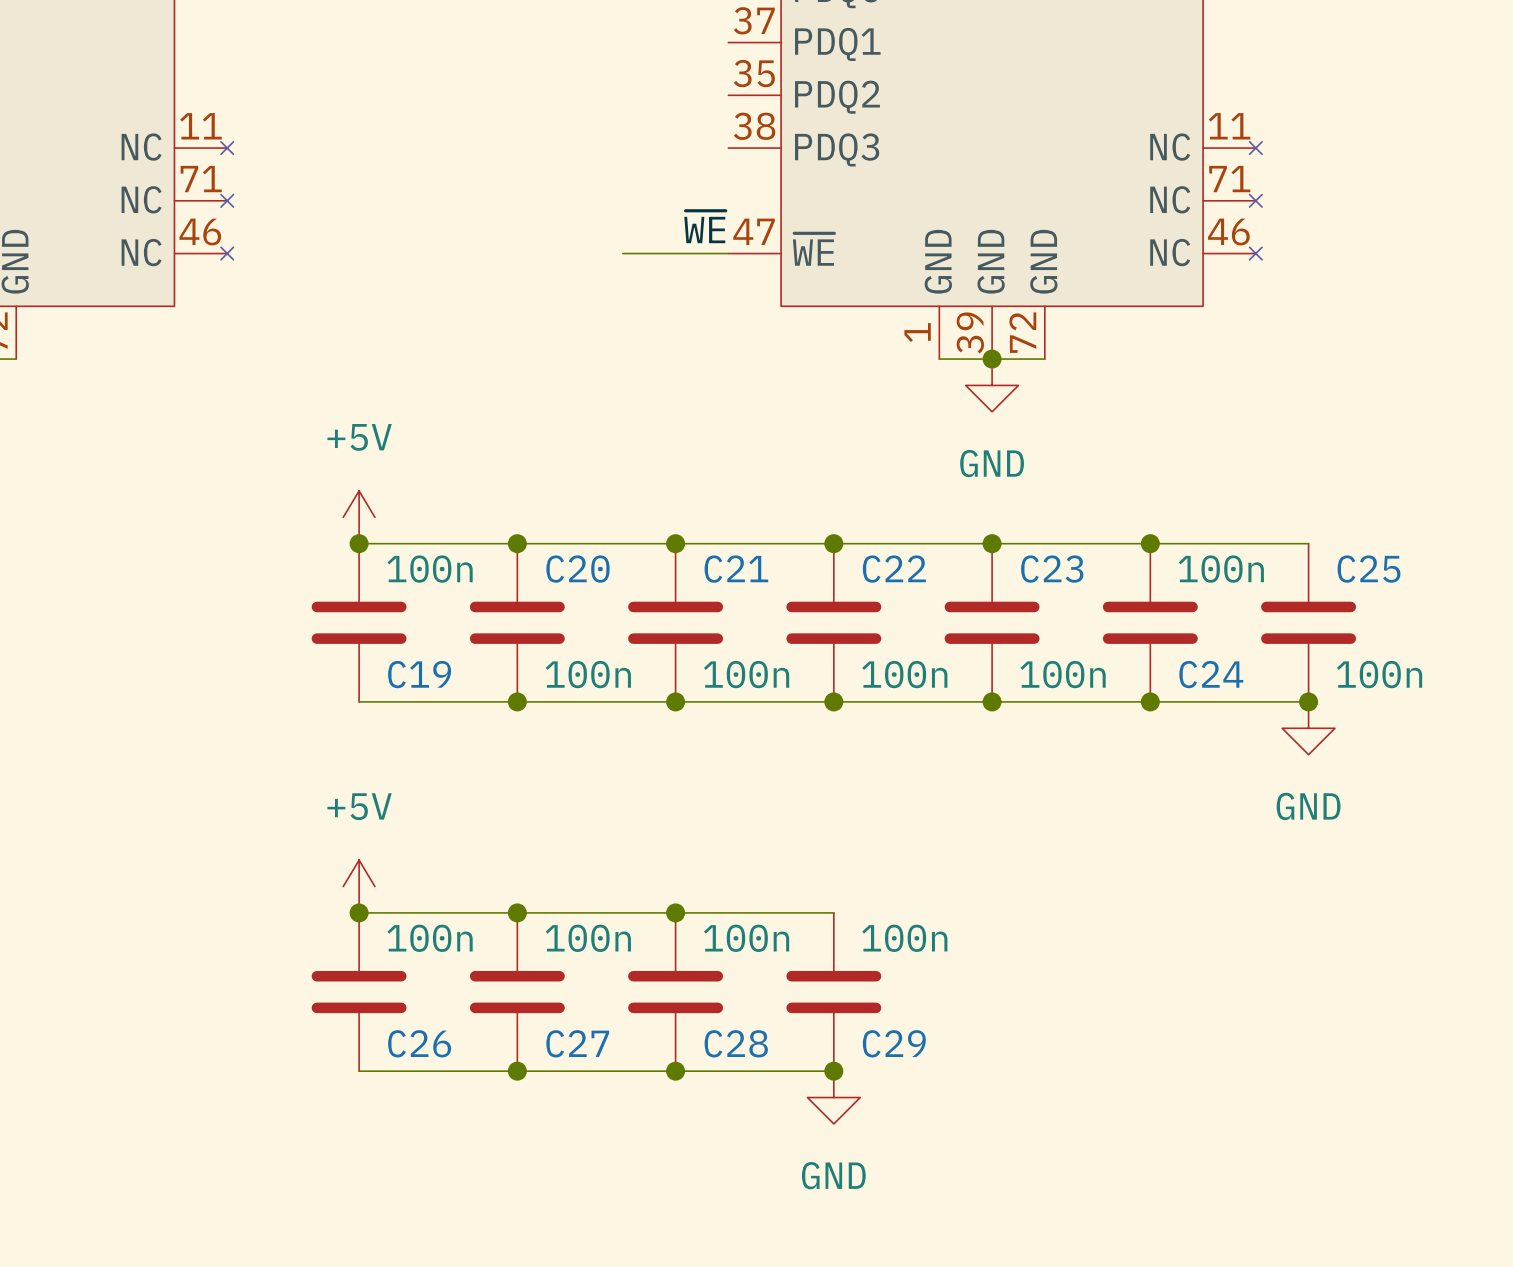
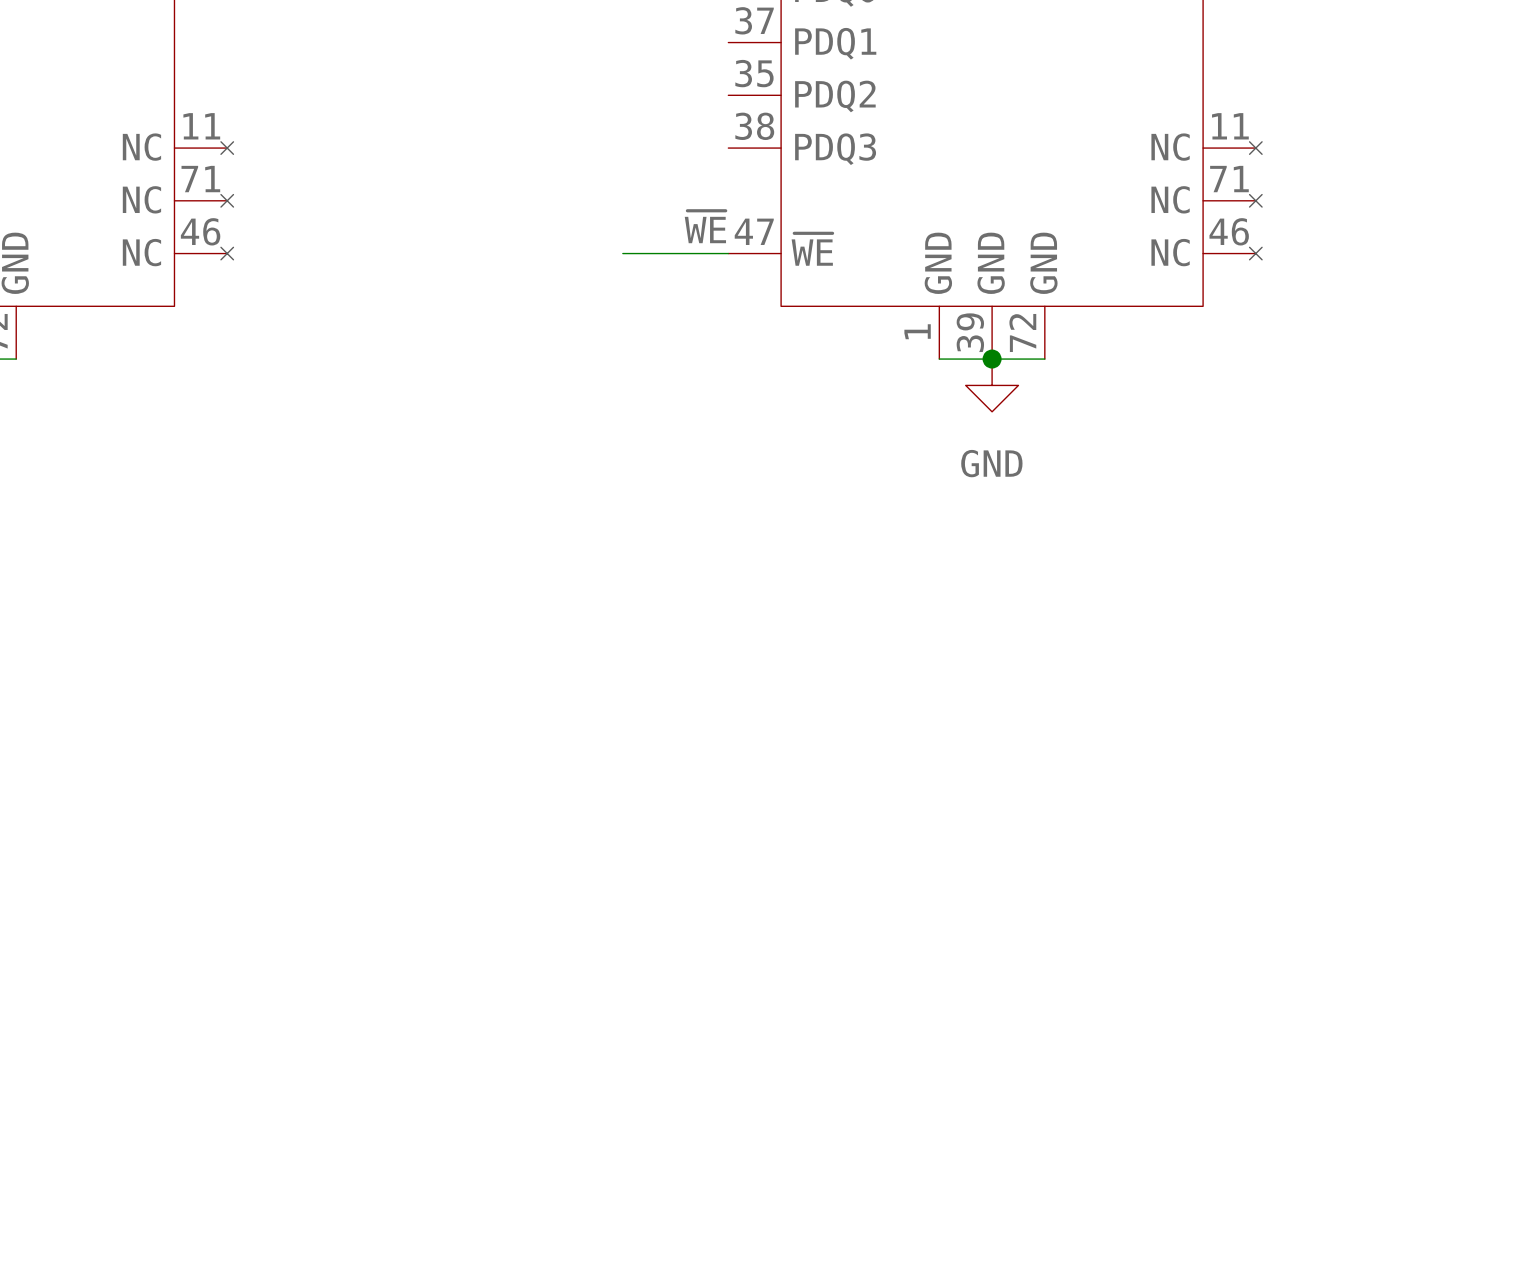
power symbol: +5V (359, 517) -> none
wire: (359, 543) (1308, 543) -> none
junction: (359, 543) -> none
junction: (517, 543) -> none
junction: (675, 543) -> none
junction: (833, 543) -> none
junction: (992, 543) -> none
junction: (1150, 543) -> none
C19: 100n (359, 622) -> none
C20: 100n (517, 622) -> none
C21: 100n (675, 622) -> none
C22: 100n (833, 622) -> none
C23: 100n (992, 622) -> none
C24: 100n (1150, 622) -> none
C25: 100n (1308, 622) -> none
wire: (359, 701) (1308, 701) -> none
junction: (517, 701) -> none
junction: (675, 701) -> none
junction: (833, 701) -> none
junction: (992, 701) -> none
junction: (1150, 701) -> none
junction: (1308, 701) -> none
power symbol: GND (1308, 728) -> none
power symbol: +5V (359, 886) -> none
wire: (359, 912) (833, 912) -> none
junction: (359, 912) -> none
junction: (517, 912) -> none
junction: (675, 912) -> none
C26: 100n (359, 992) -> none
C27: 100n (517, 992) -> none
C28: 100n (675, 992) -> none
C29: 100n (833, 992) -> none
wire: (359, 1071) (833, 1071) -> none
junction: (517, 1071) -> none
junction: (675, 1071) -> none
junction: (833, 1071) -> none
power symbol: GND (833, 1097) -> none

